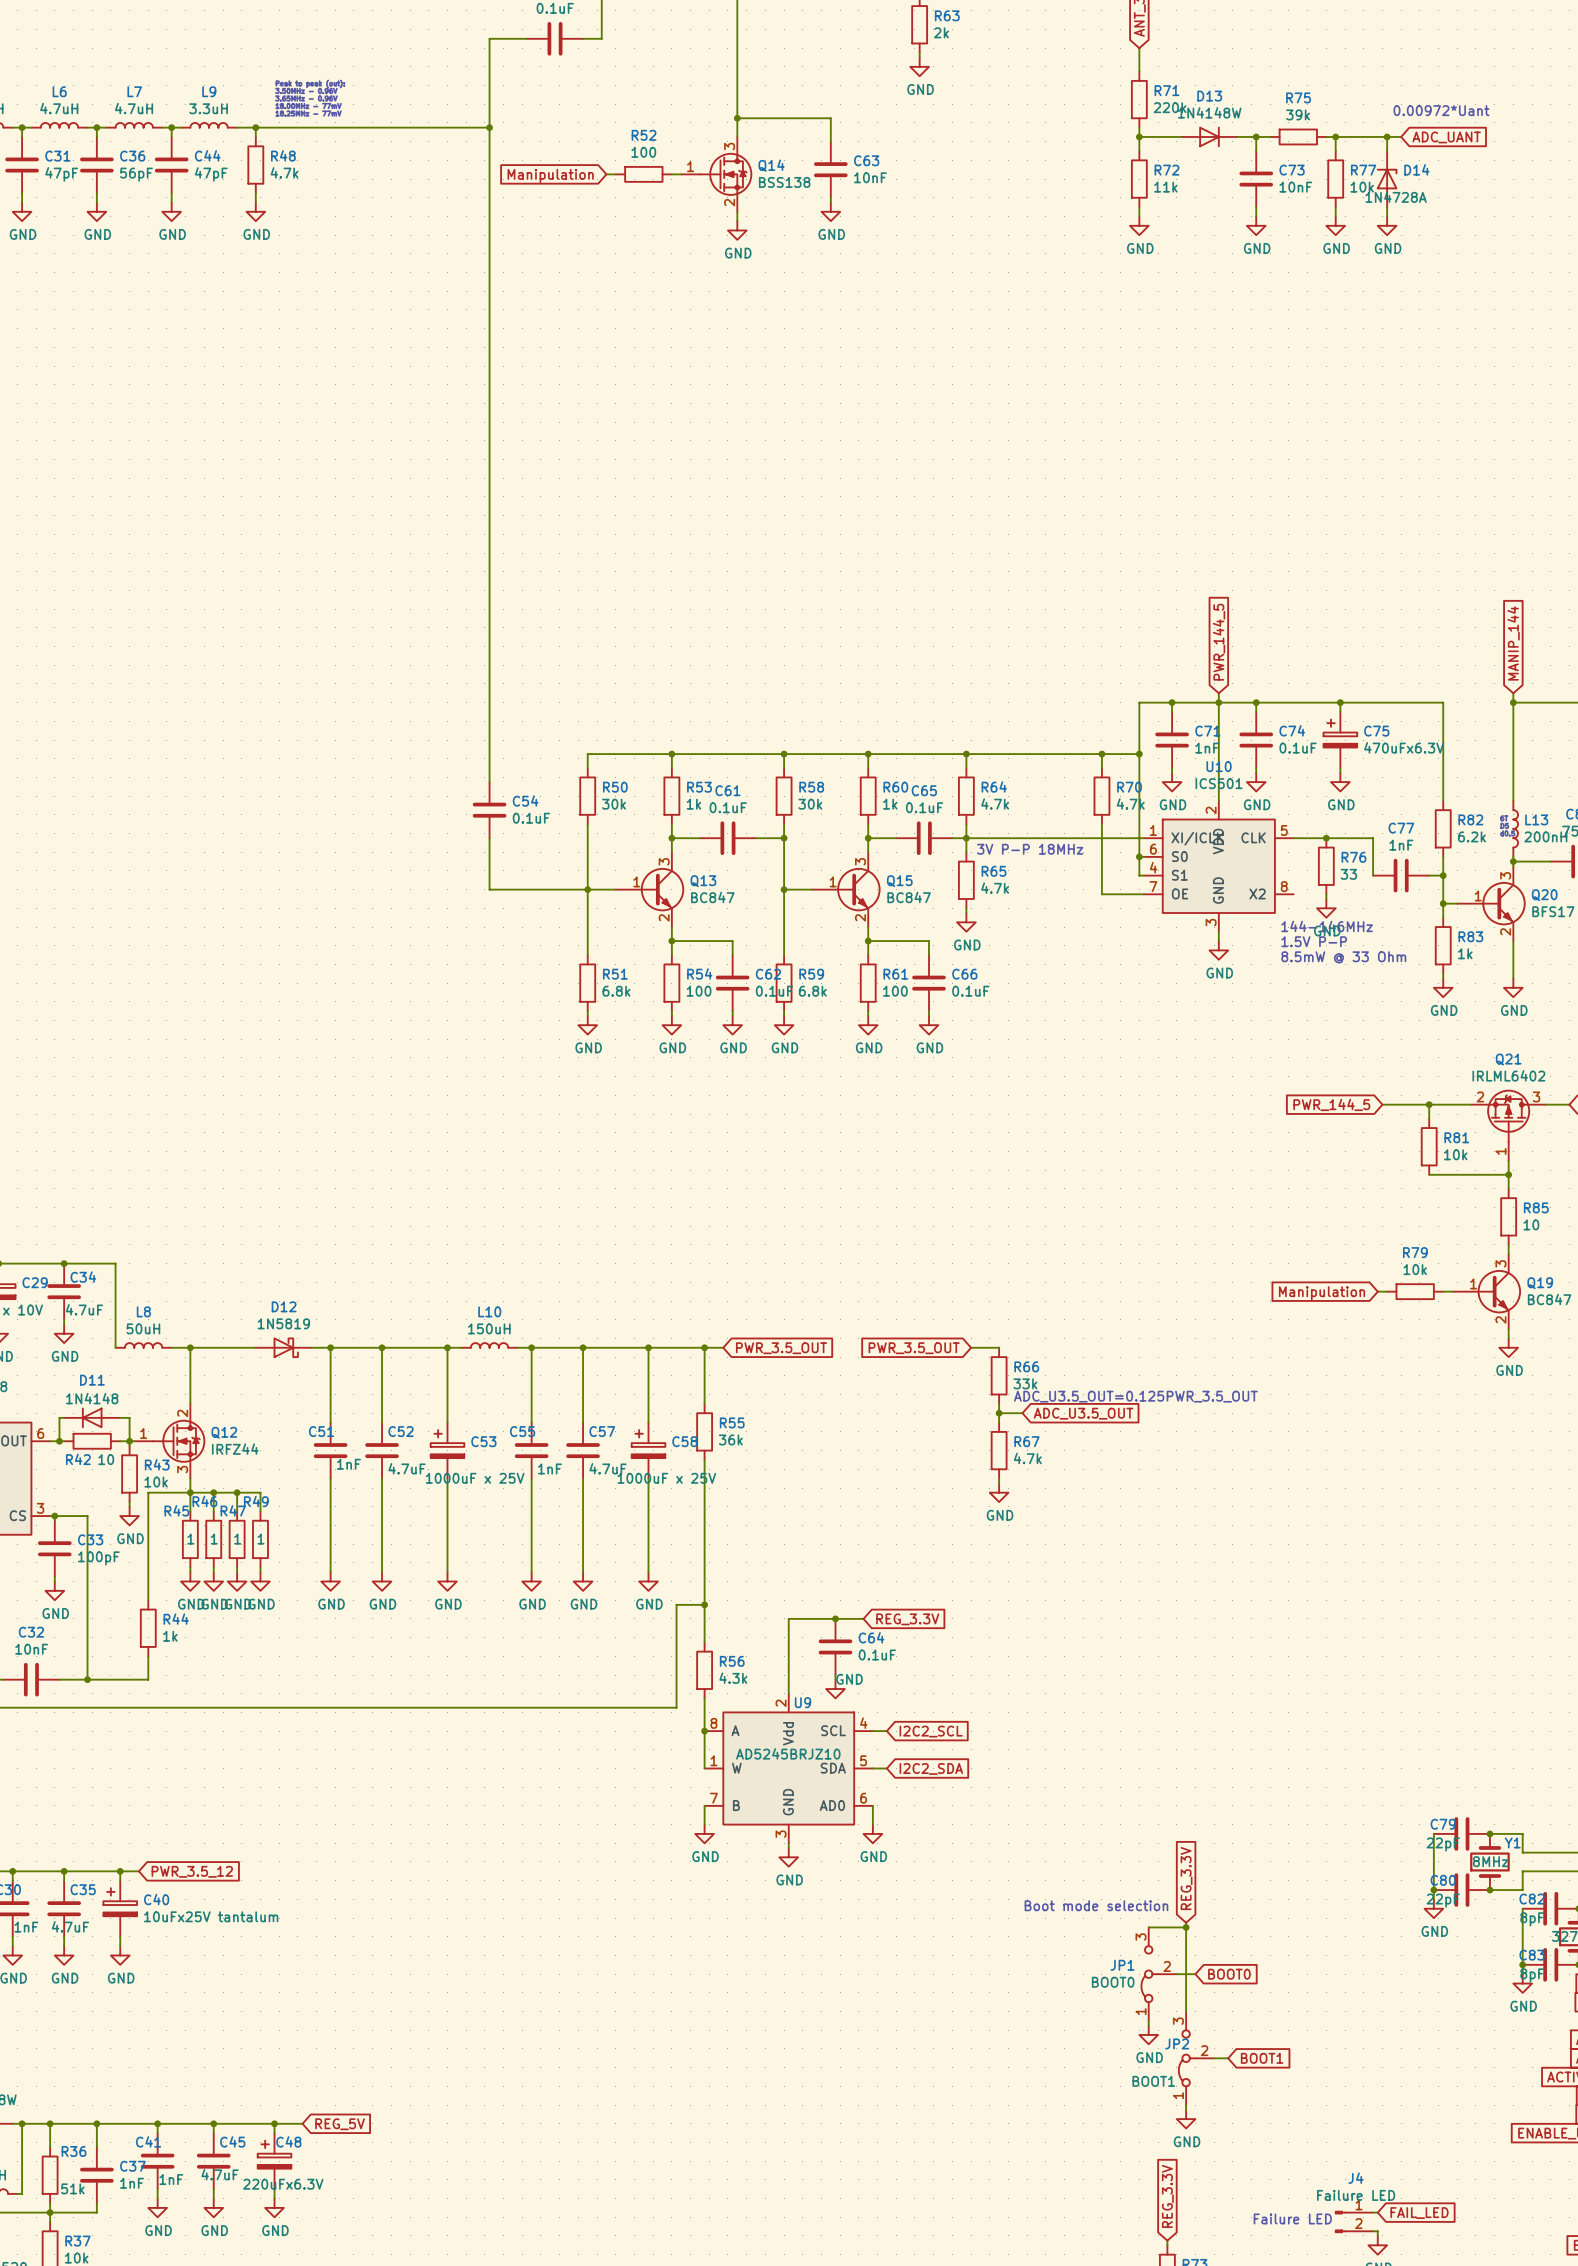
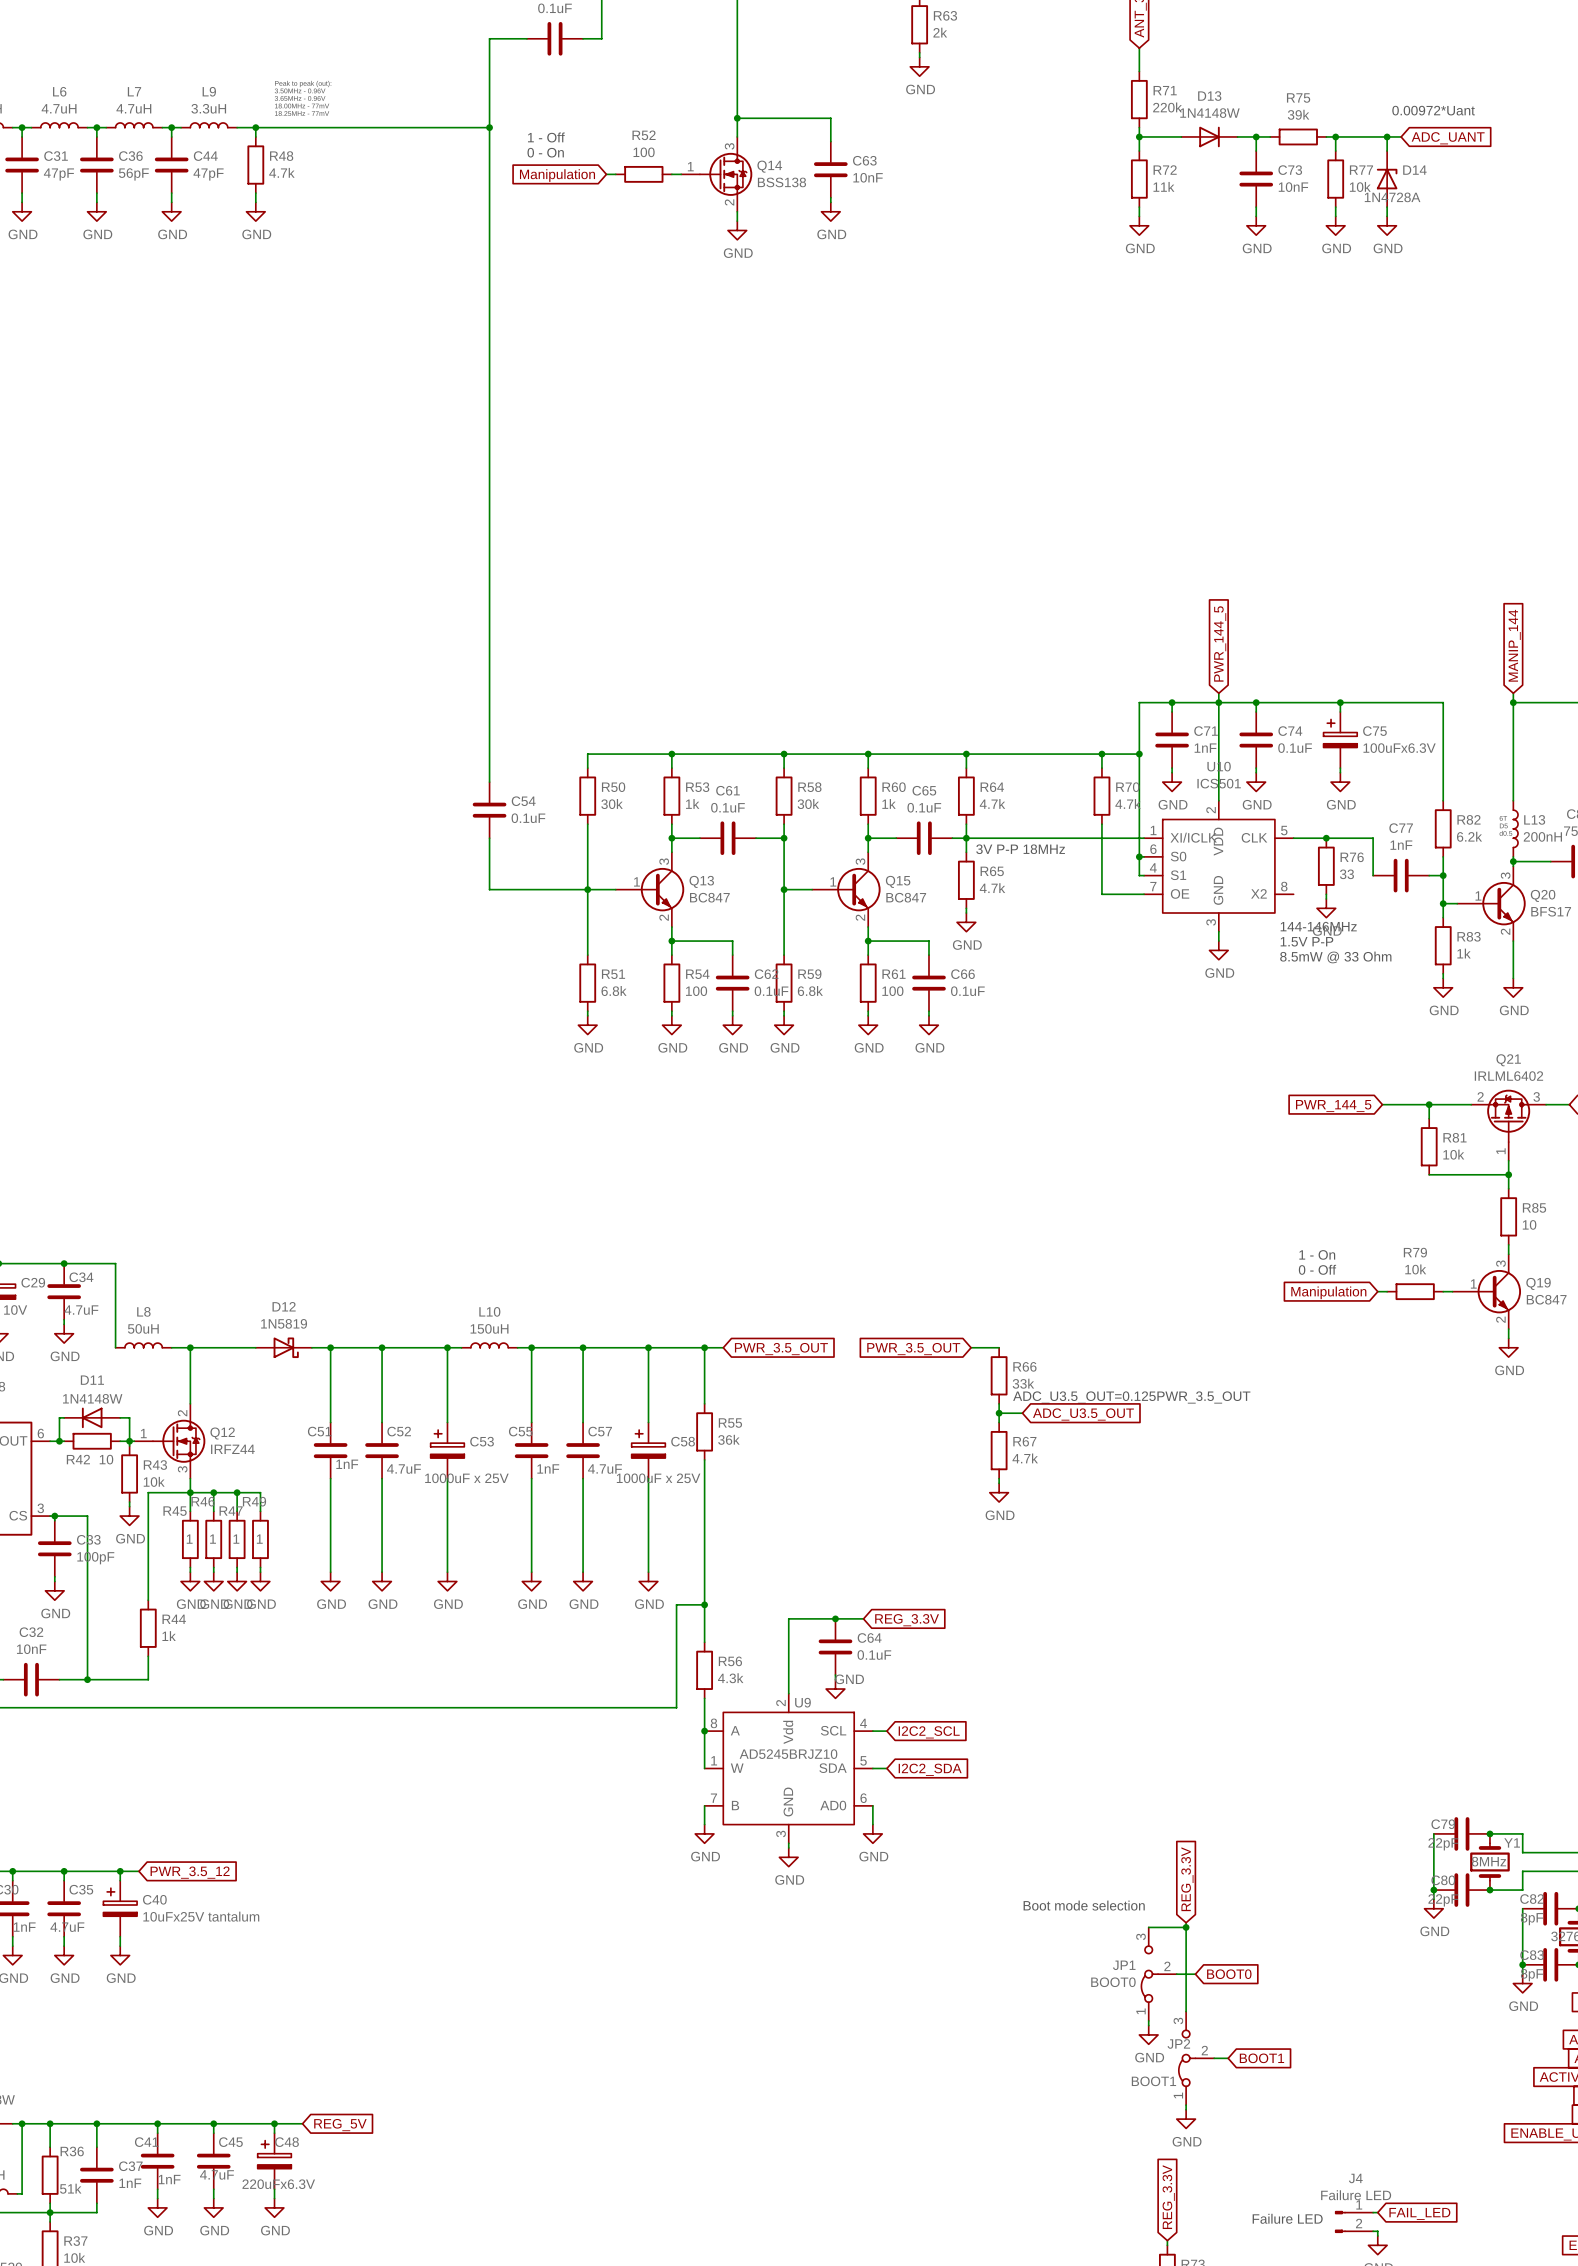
text: none -> 1 - Off (546, 137)
text: none -> 0 - On (545, 152)
C75 value: 470uFx6.3V (1404, 747) -> 100uFx6.3V (1399, 748)
text: none -> 1 - On (1317, 1254)
text: none -> 0 - Off (1317, 1269)
D11 value: 1N4148 (92, 1398) -> 1N4148W (92, 1398)

